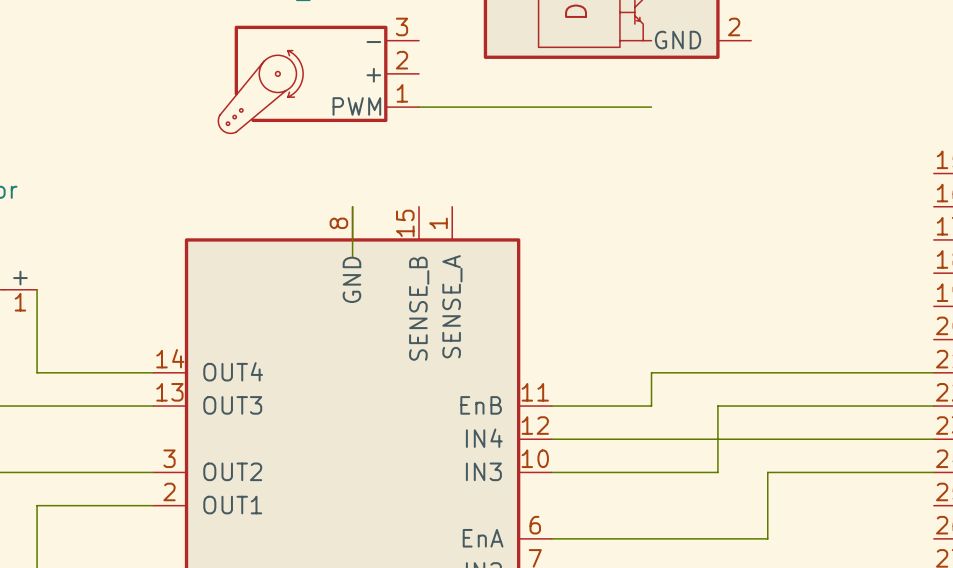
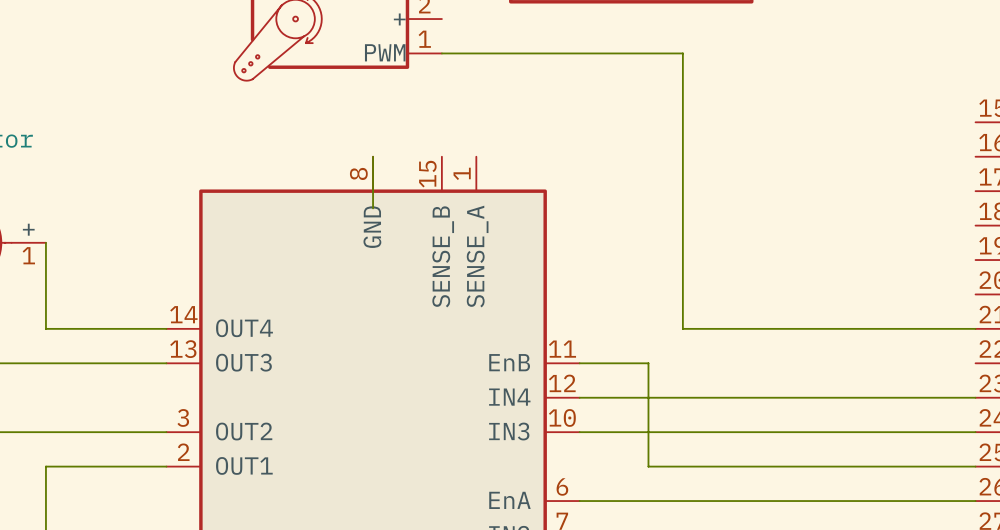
wire: (651, 372) (651, 406) (618, 406) -> (682, 328) (682, 53)
wire: none -> (648, 363) (648, 466) (975, 466)
wire: (933, 406) (717, 406) (717, 472) -> none
wire: (767, 472) (767, 538) -> (803, 432) (751, 432)
wire: none -> (803, 501) (975, 501)

